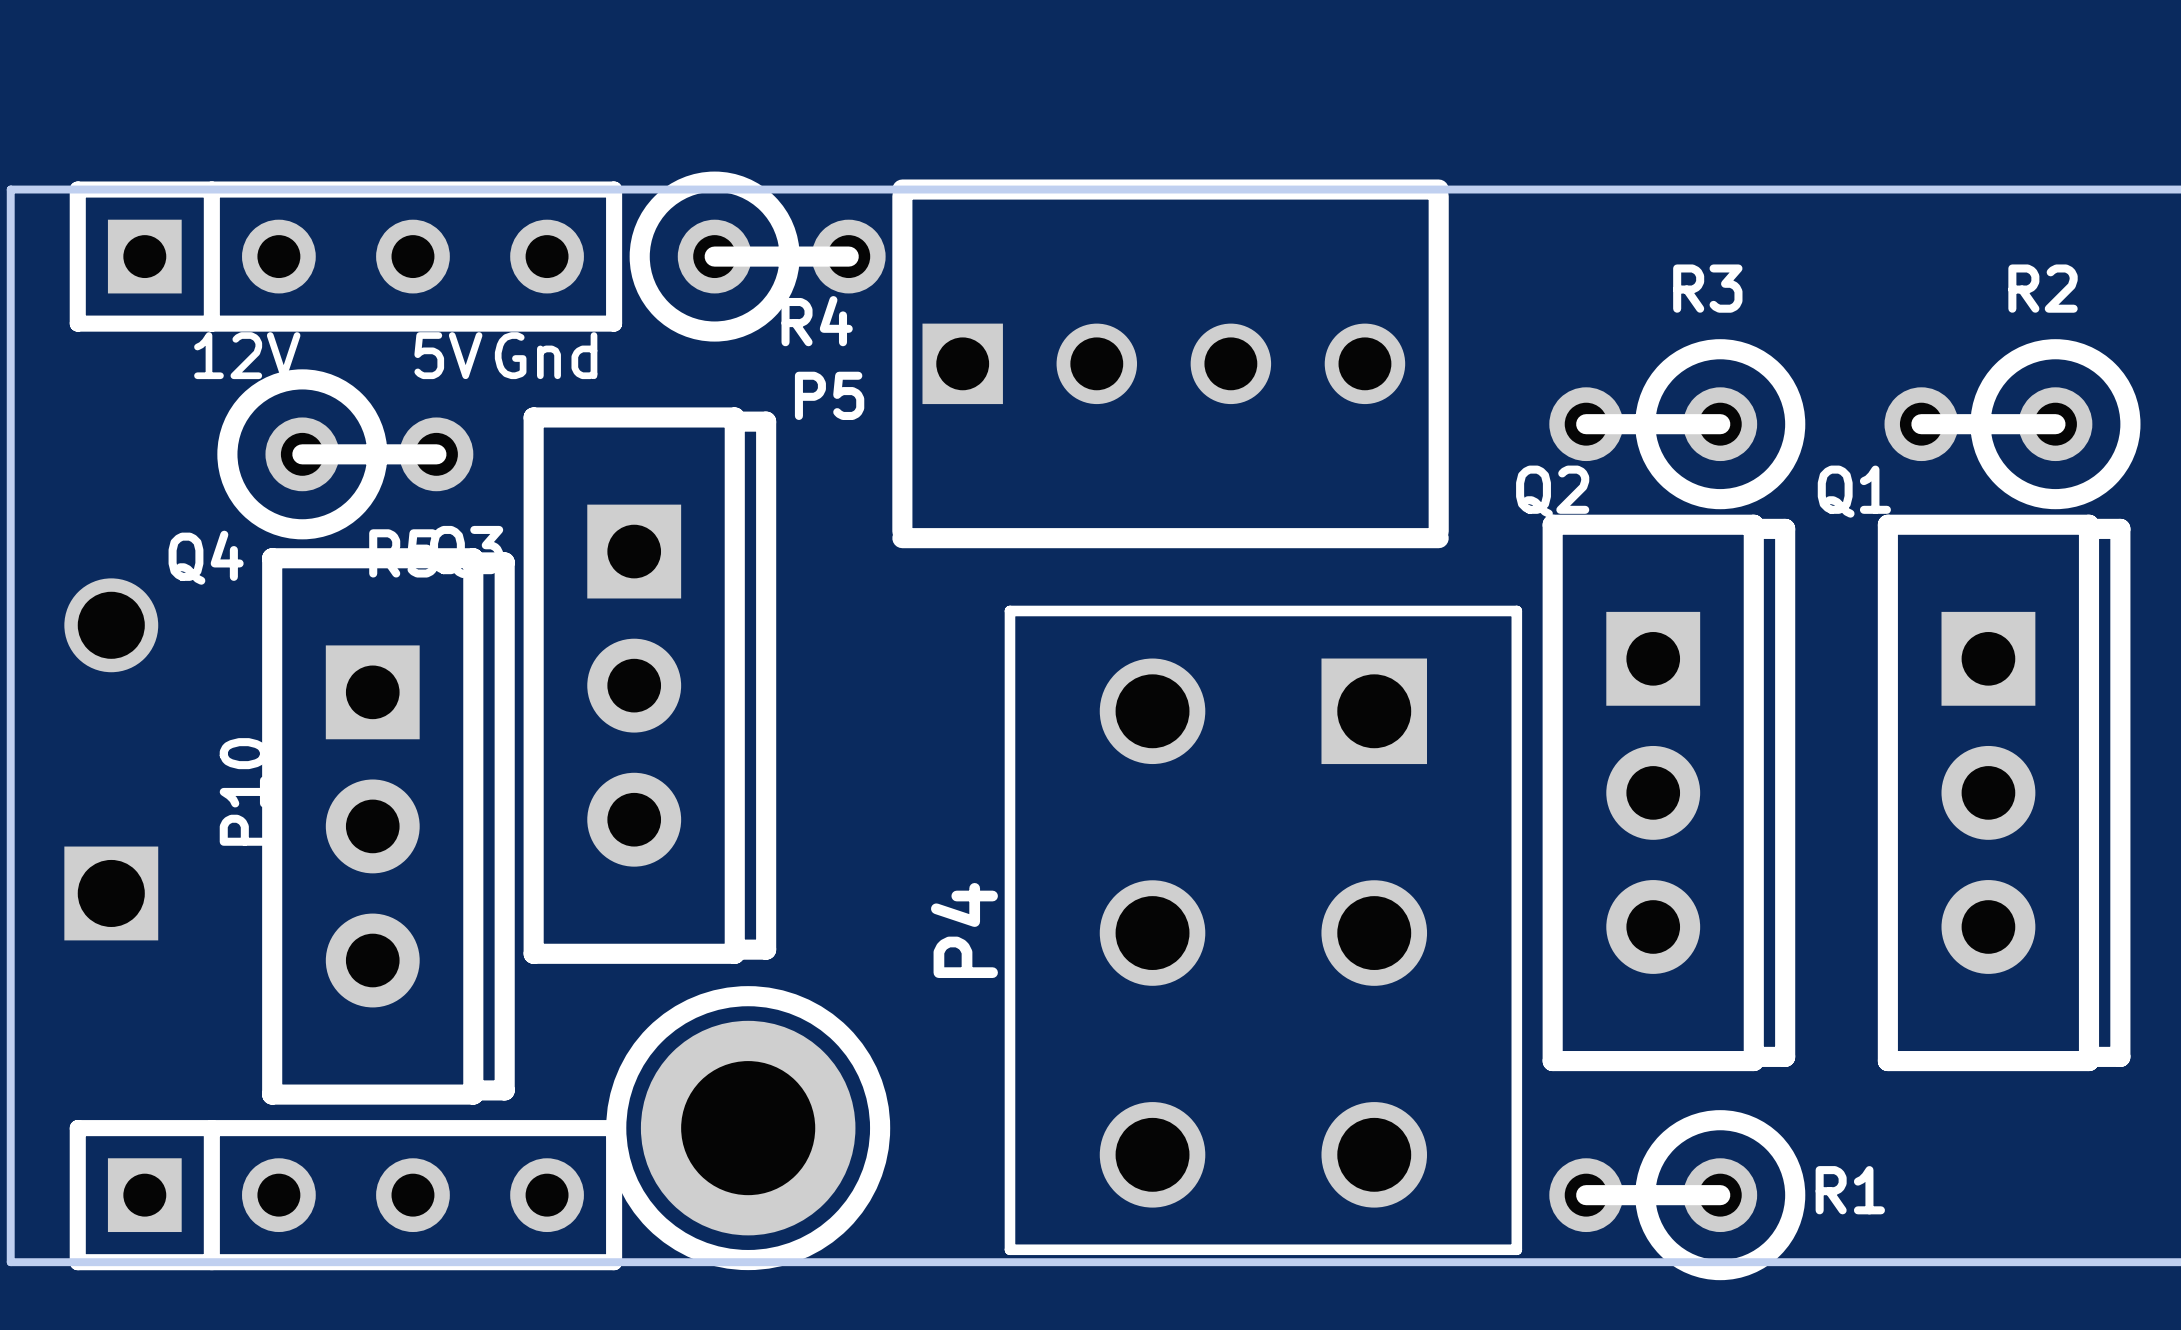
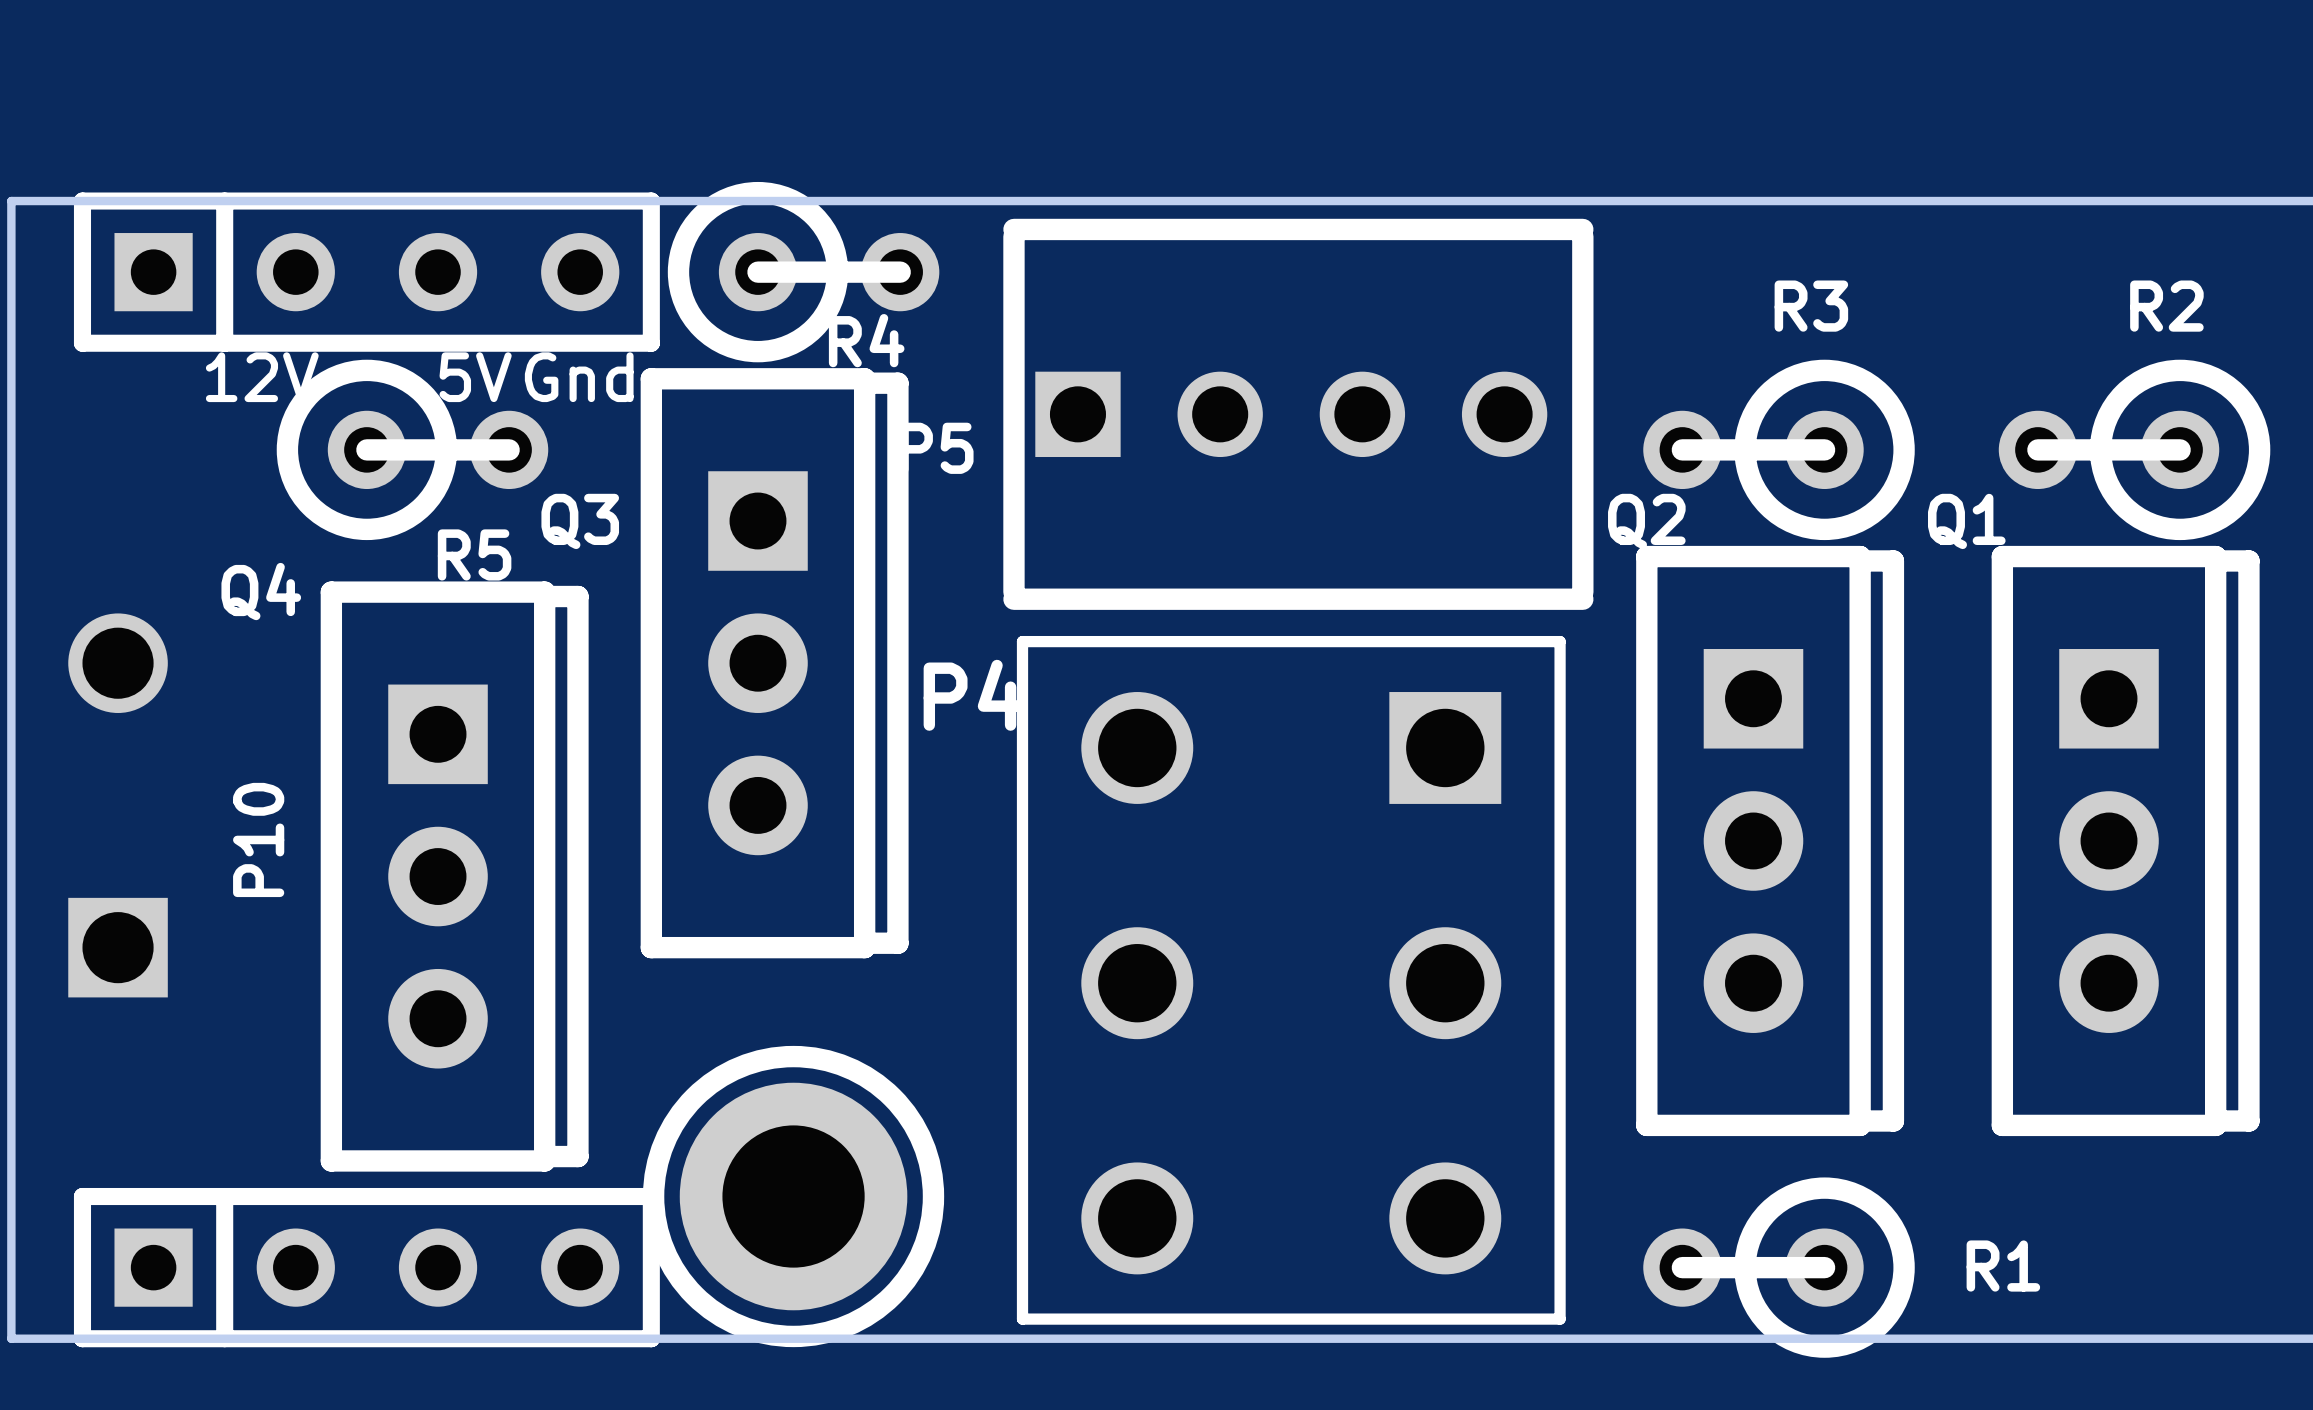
P5 position: (1170, 363) -> (1298, 414)
R5 position: (345, 454) -> (412, 449)
P4 footprint: [1004, 605, 1523, 1256] -> [1016, 635, 1566, 1325]
Q3 position: (649, 685) -> (774, 663)
Q4 position: (388, 826) -> (454, 876)
P4 name position: P4 (964, 930) -> P4 (974, 695)
R1 name position: R1 (1850, 1190) -> R1 (2003, 1266)

